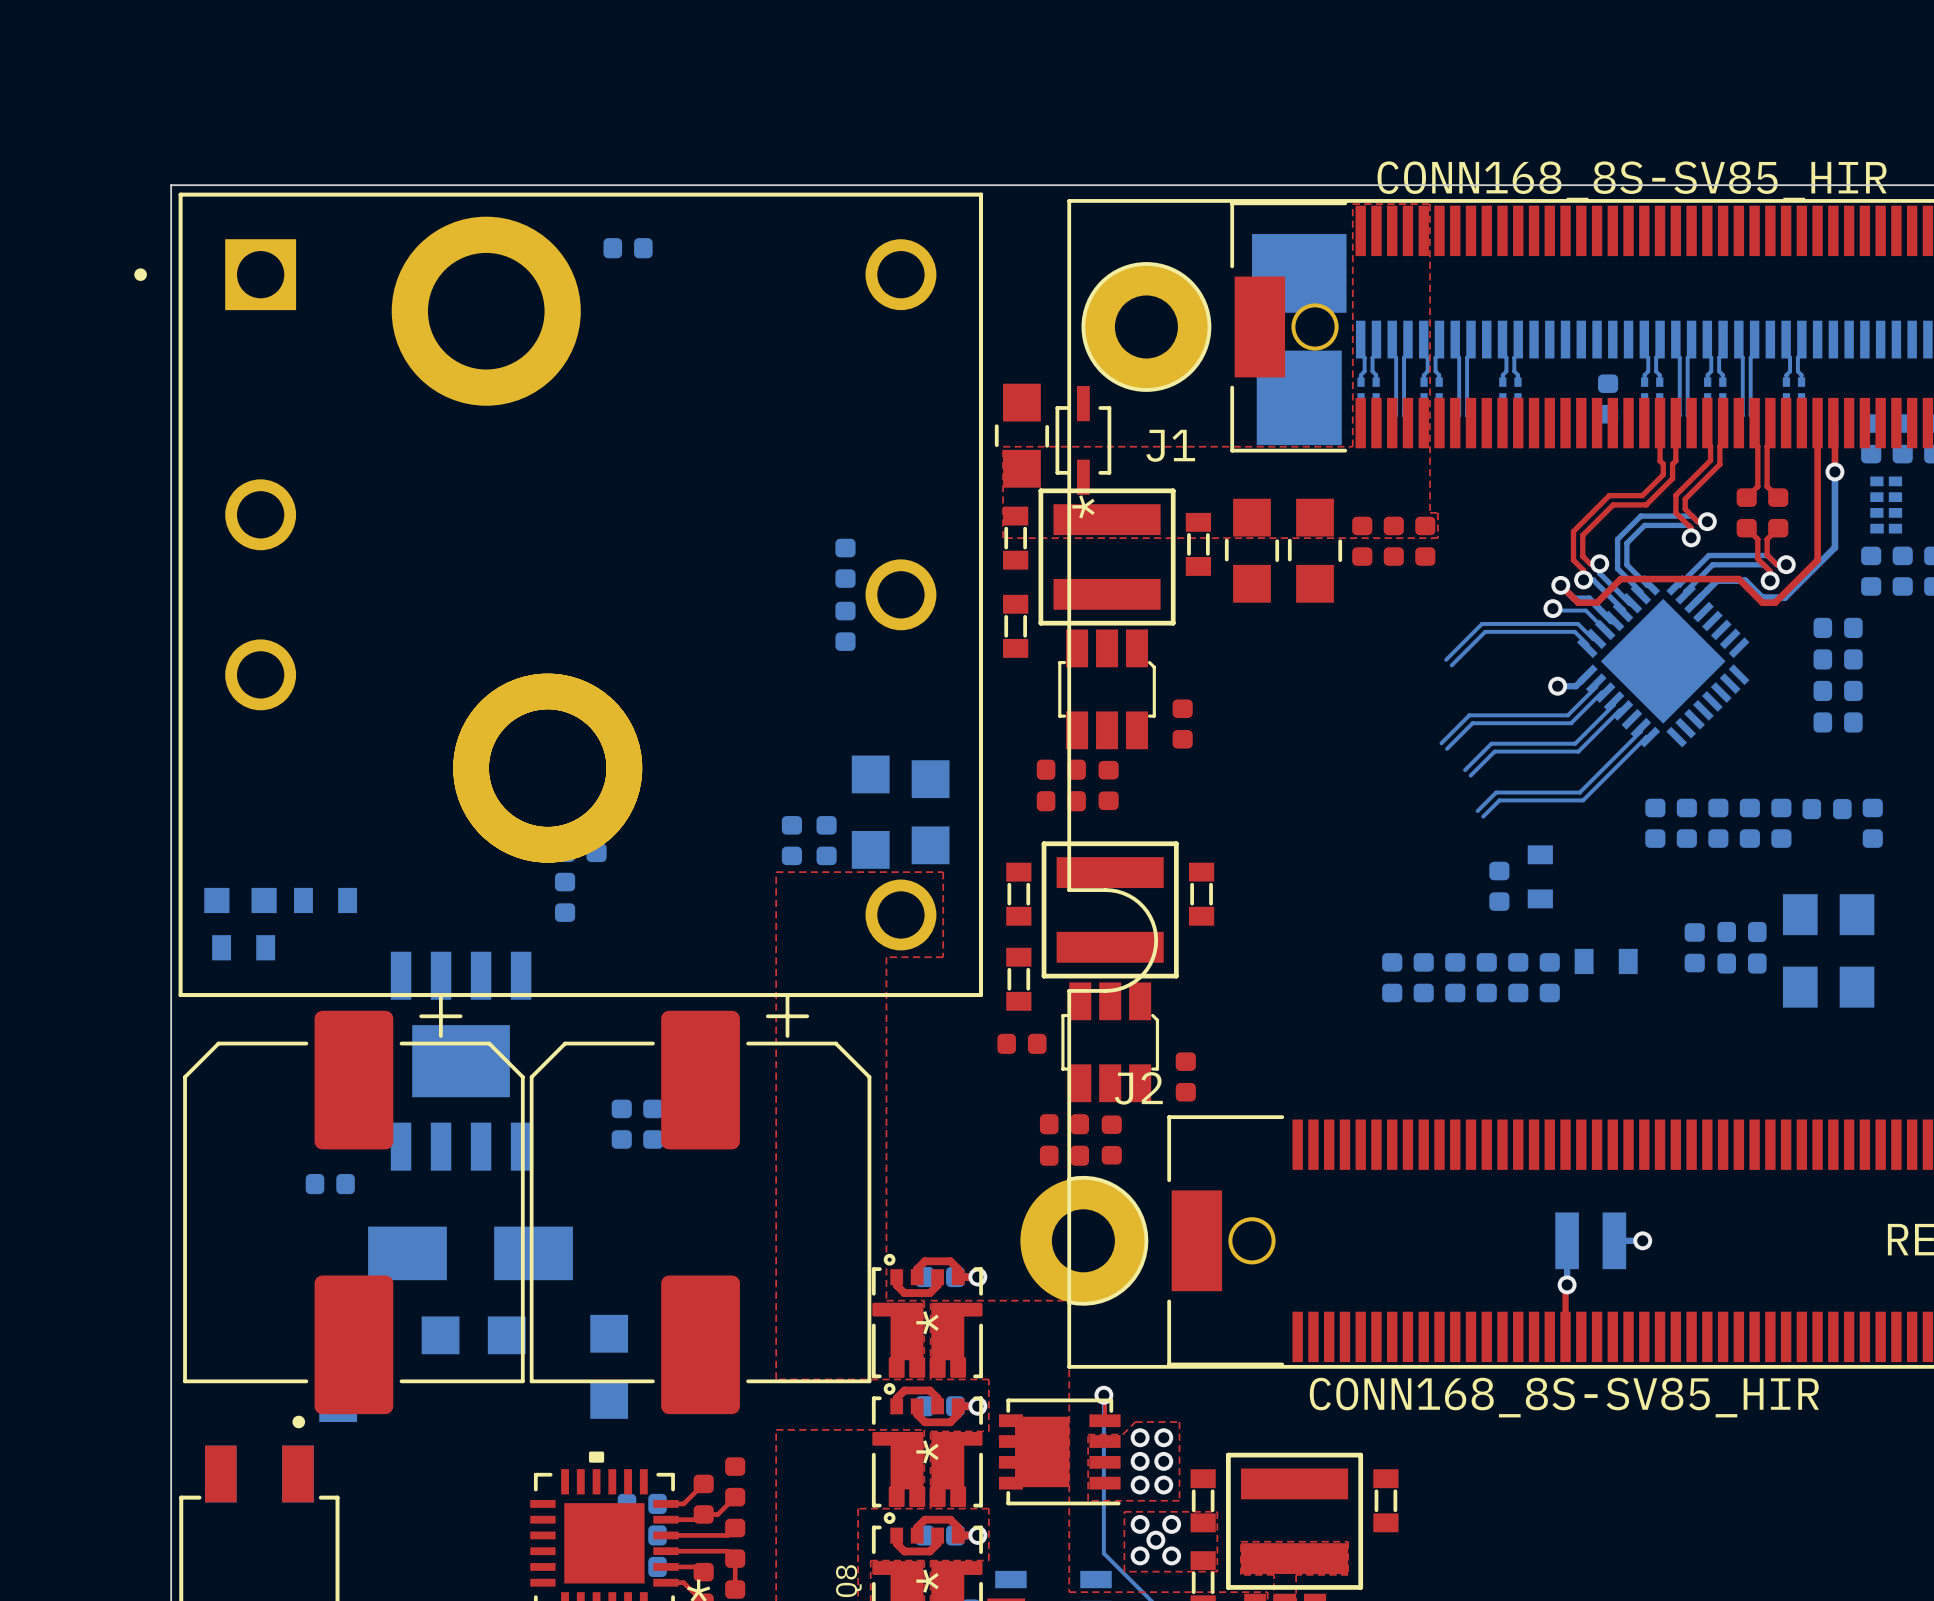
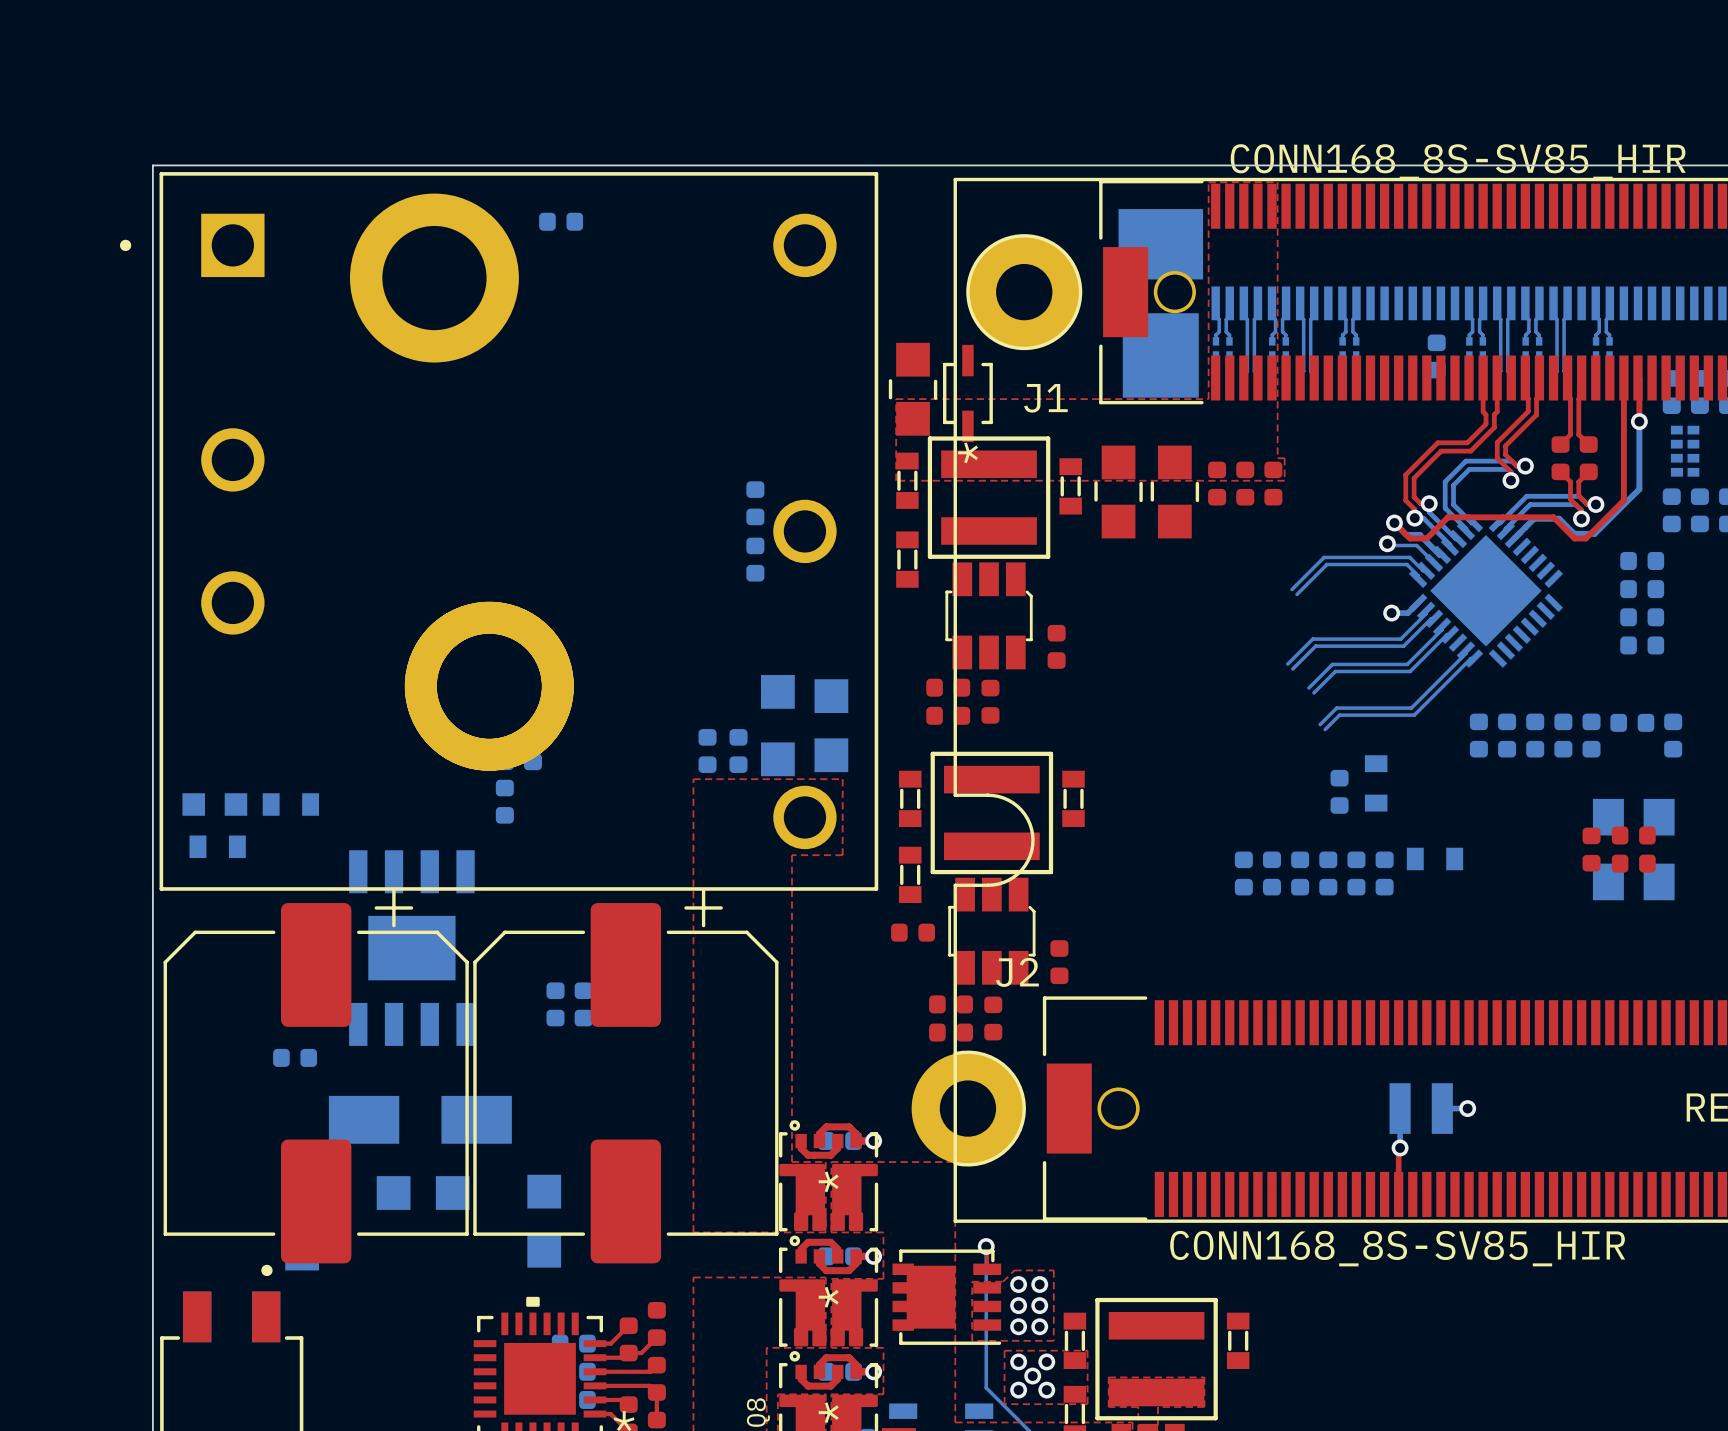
part side: bottom (1742, 931) -> top (1633, 863)
part side: bottom (1694, 947) -> top (1591, 849)
part side: bottom (1742, 963) -> top (1633, 835)

